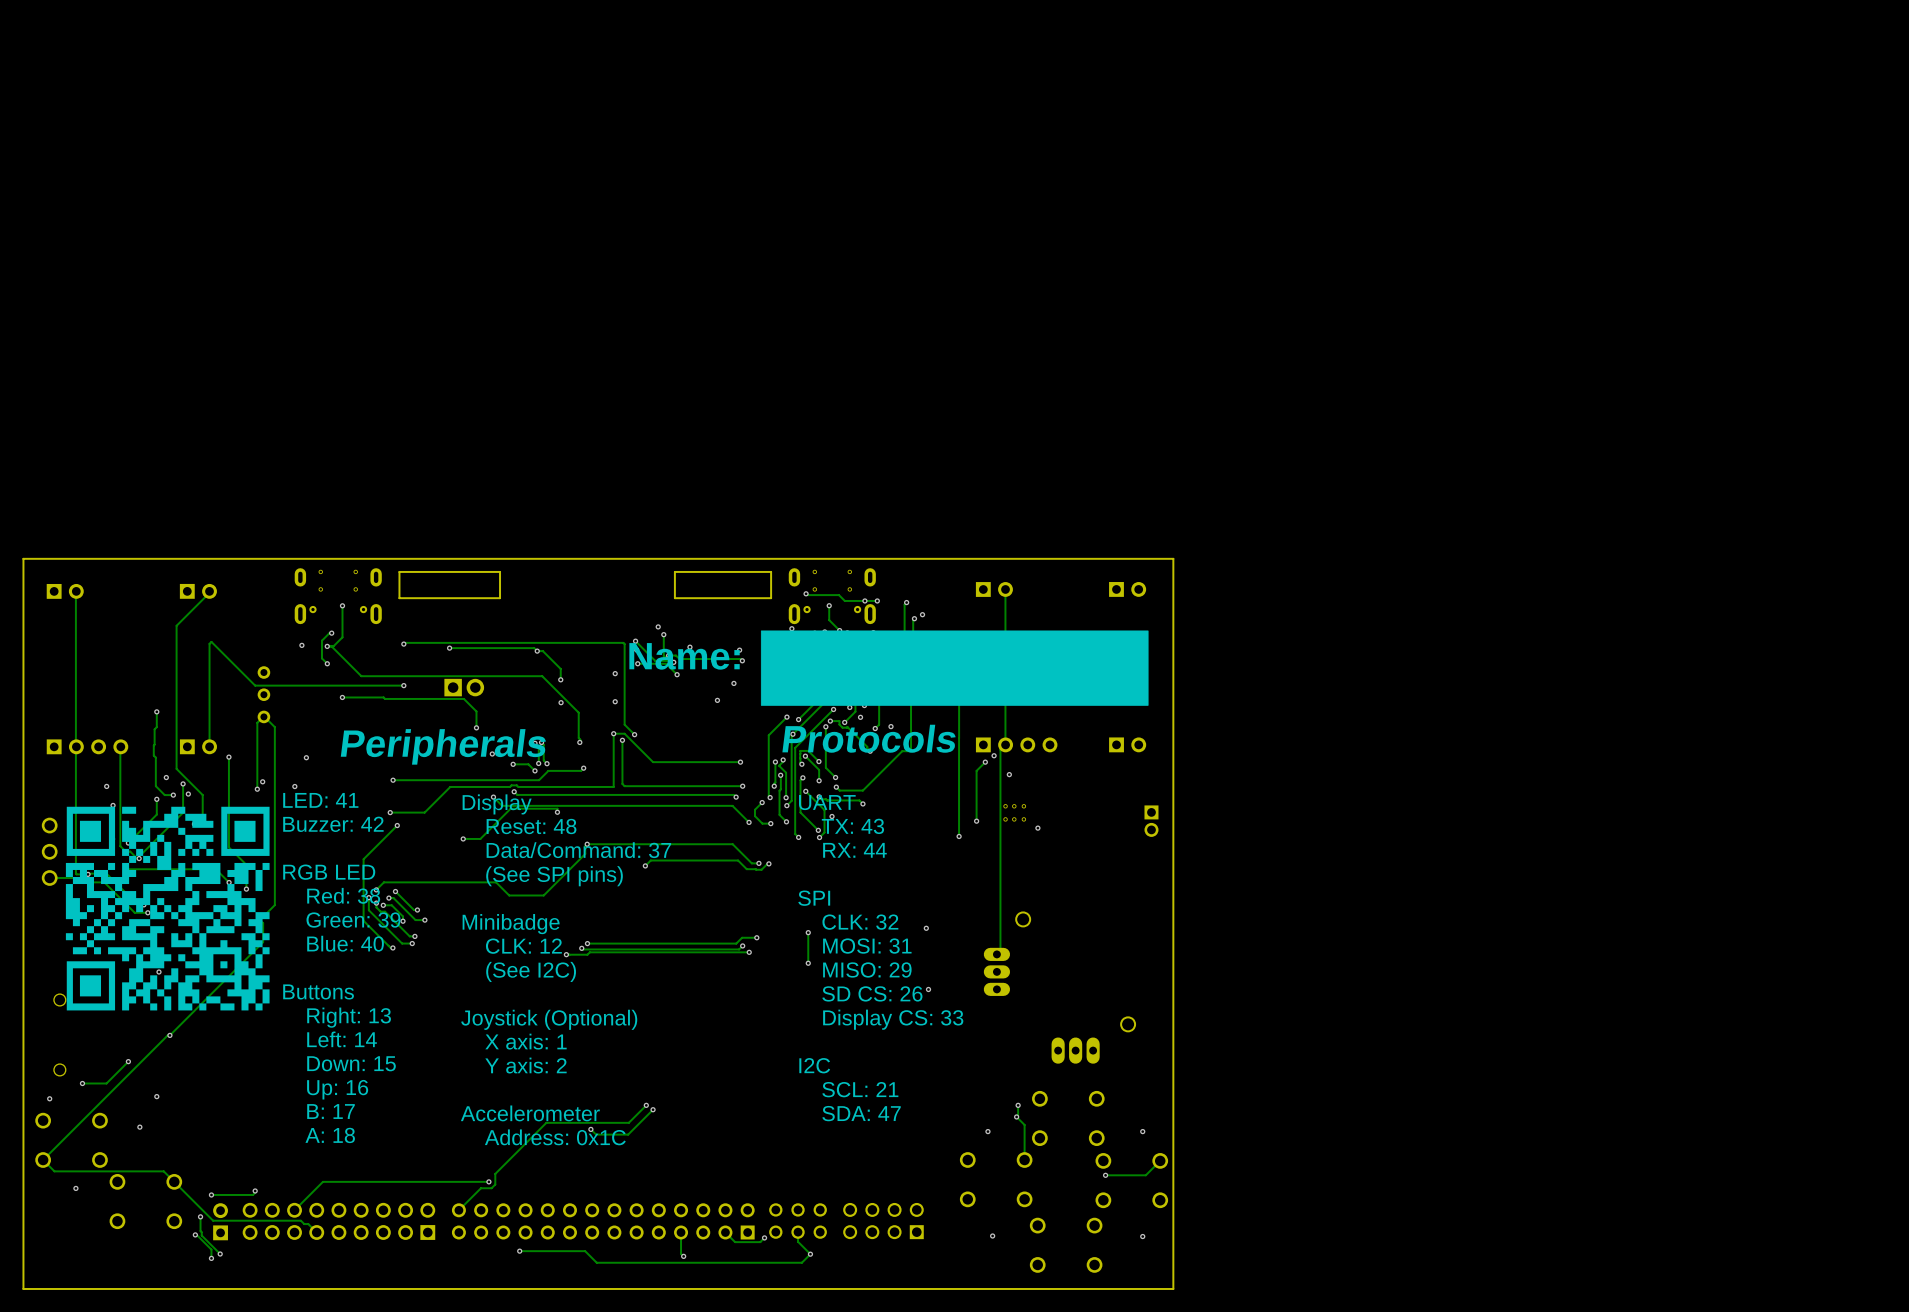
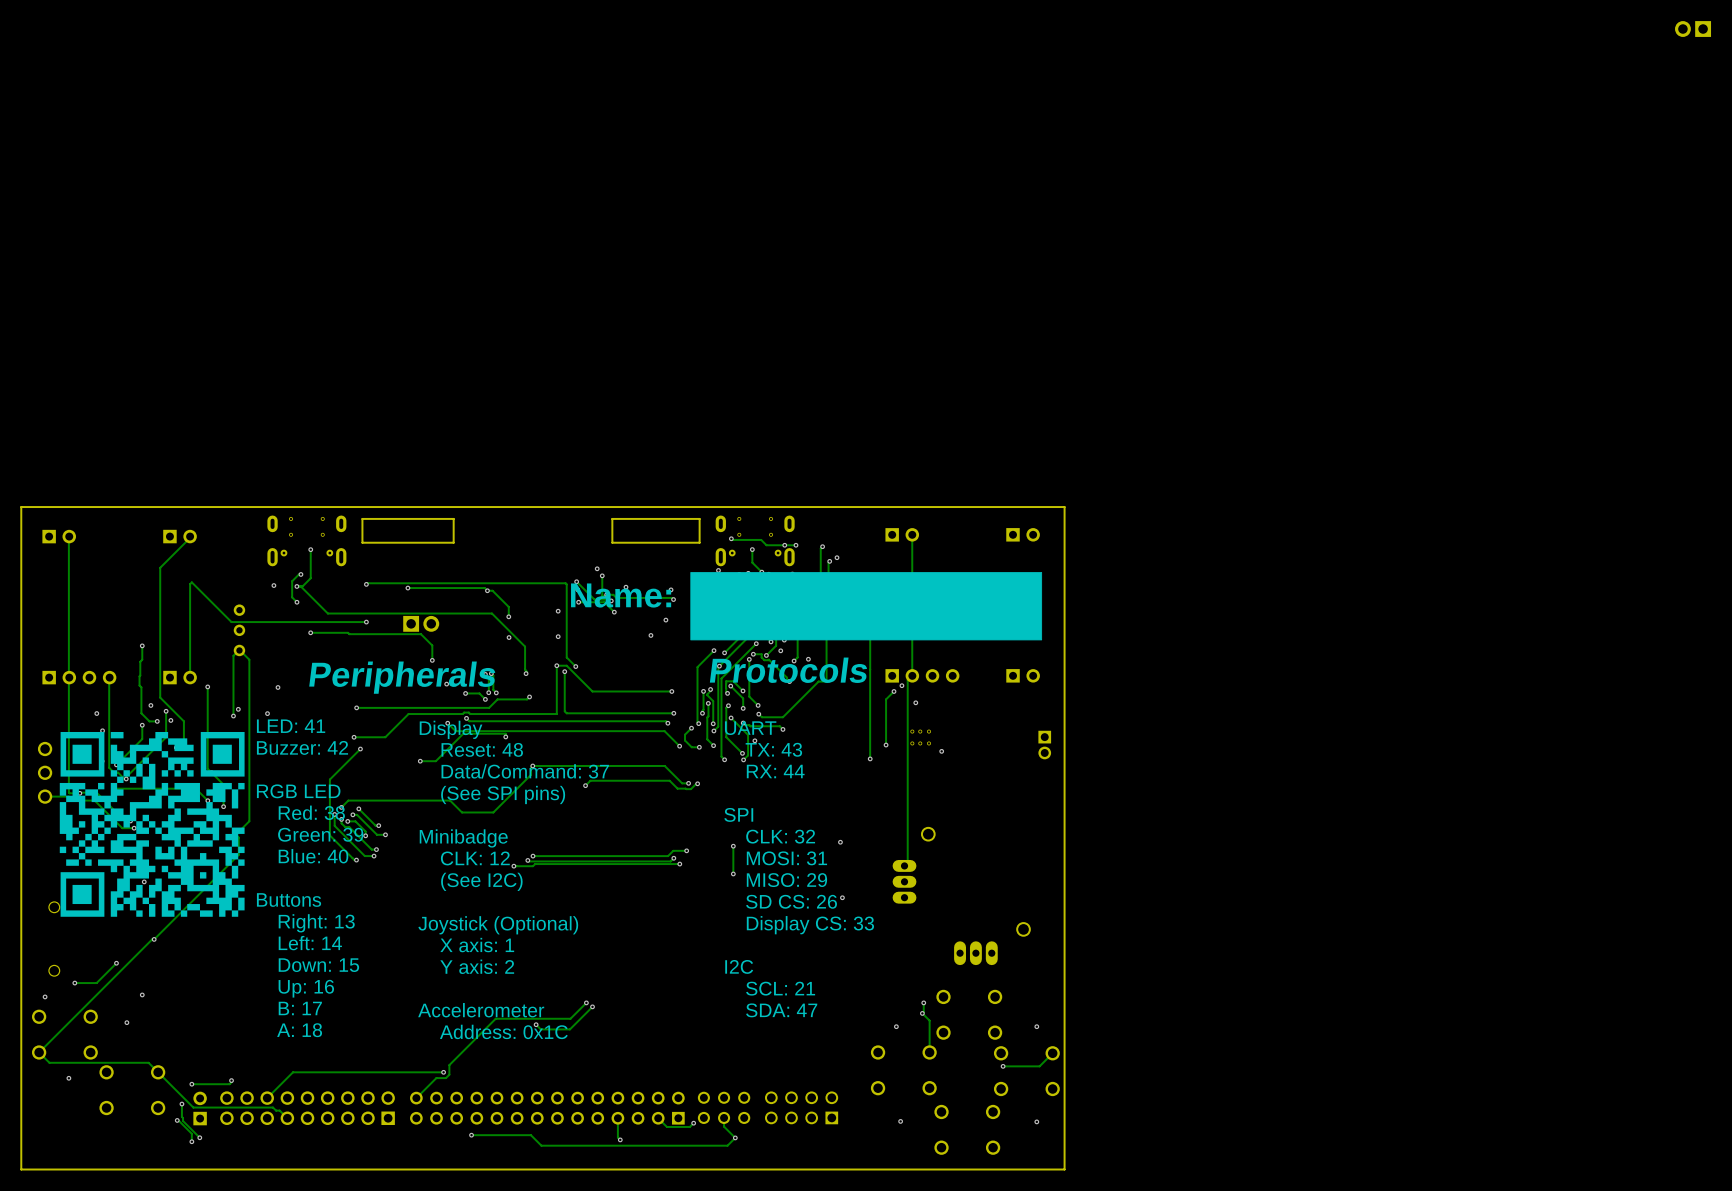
part: none -> (1693, 29)

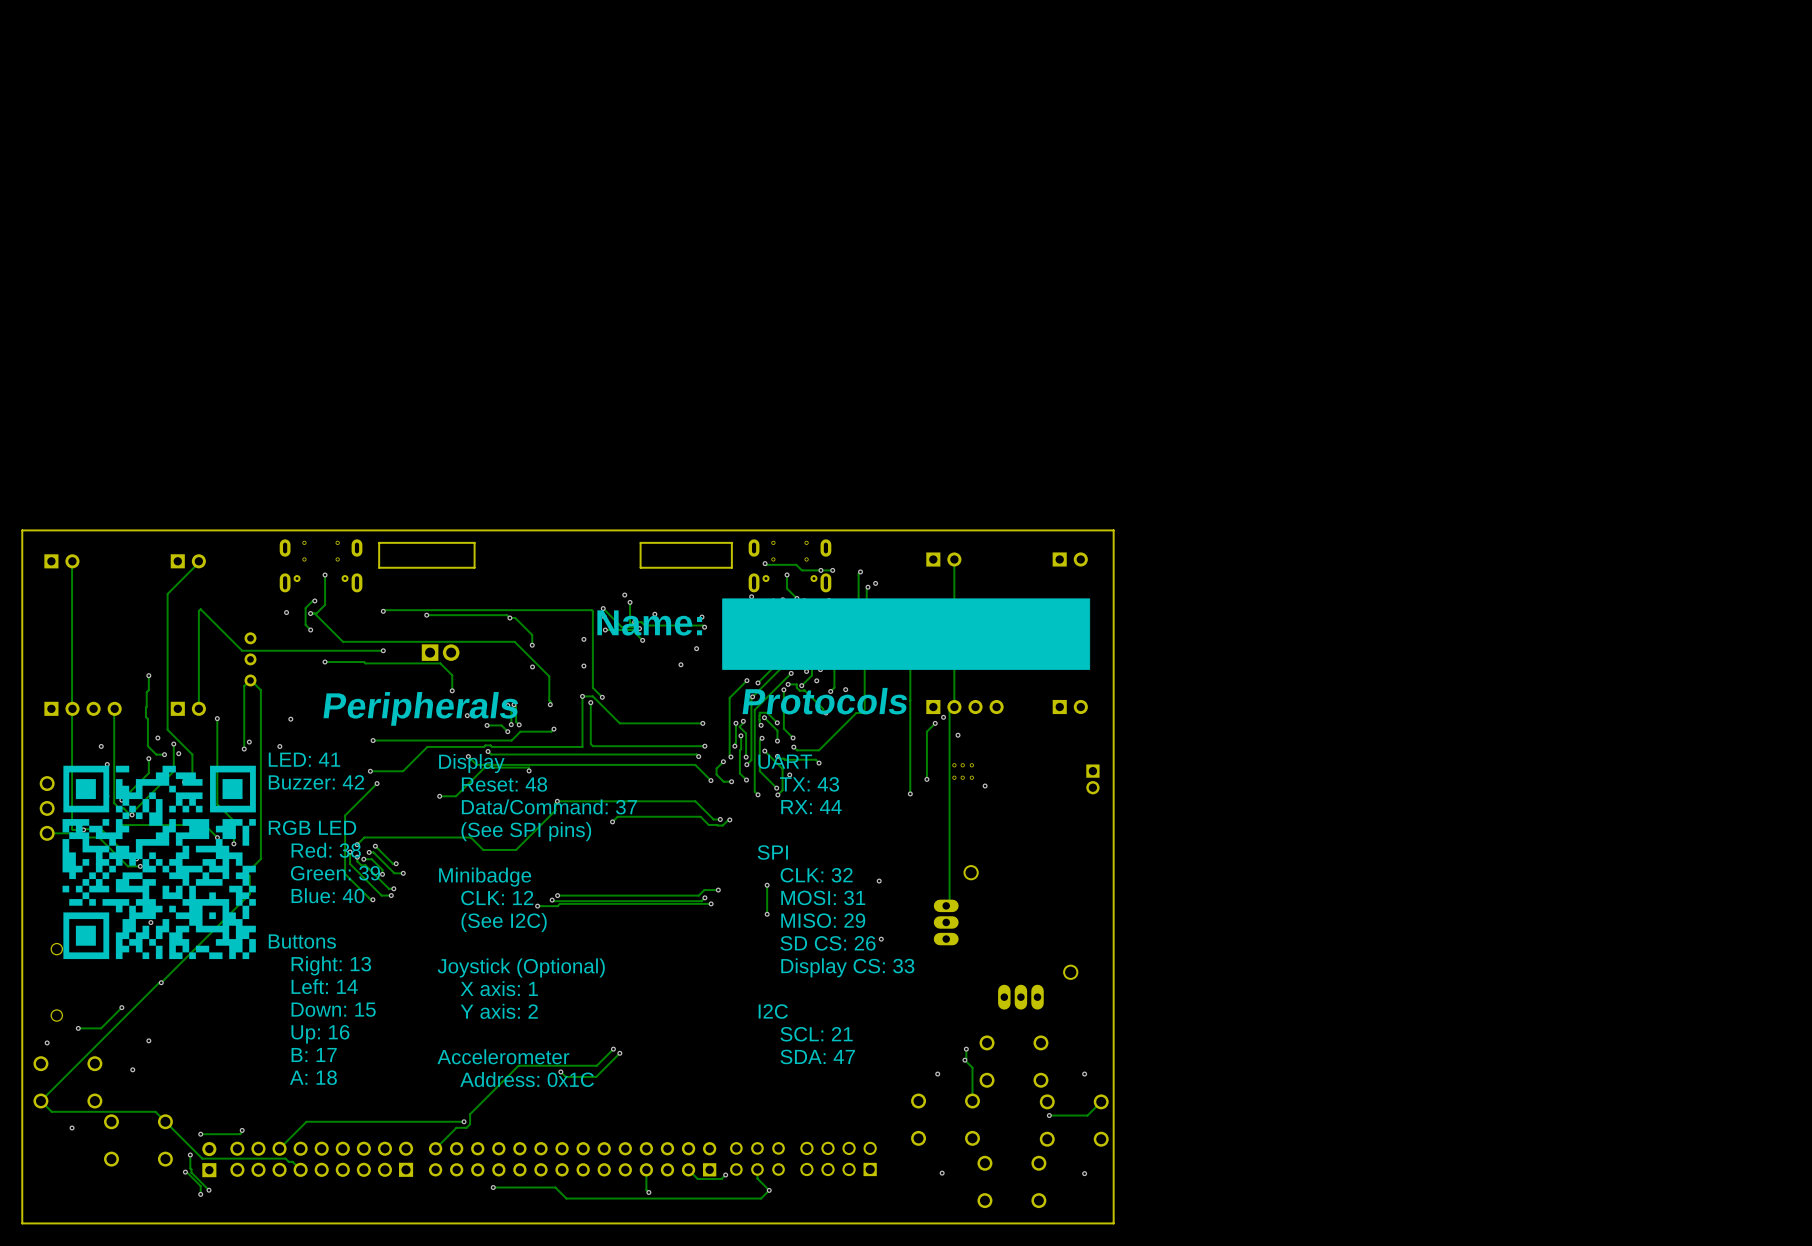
part: (1693, 29) -> none

